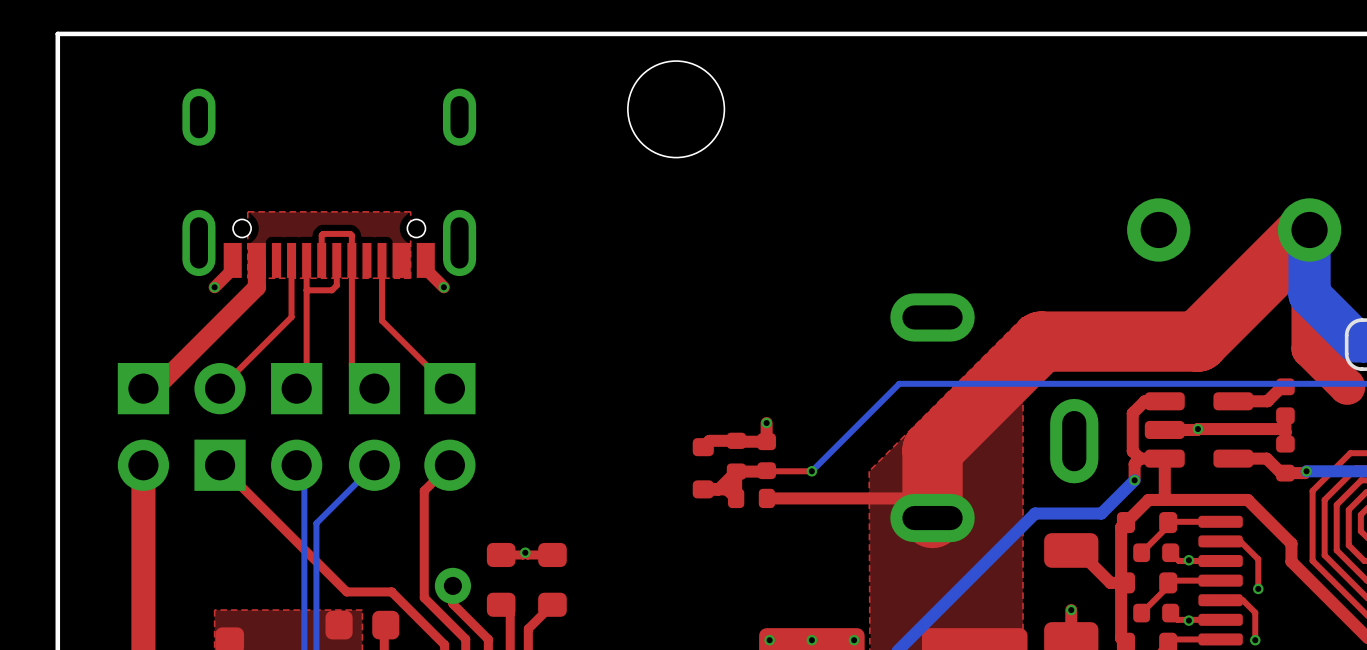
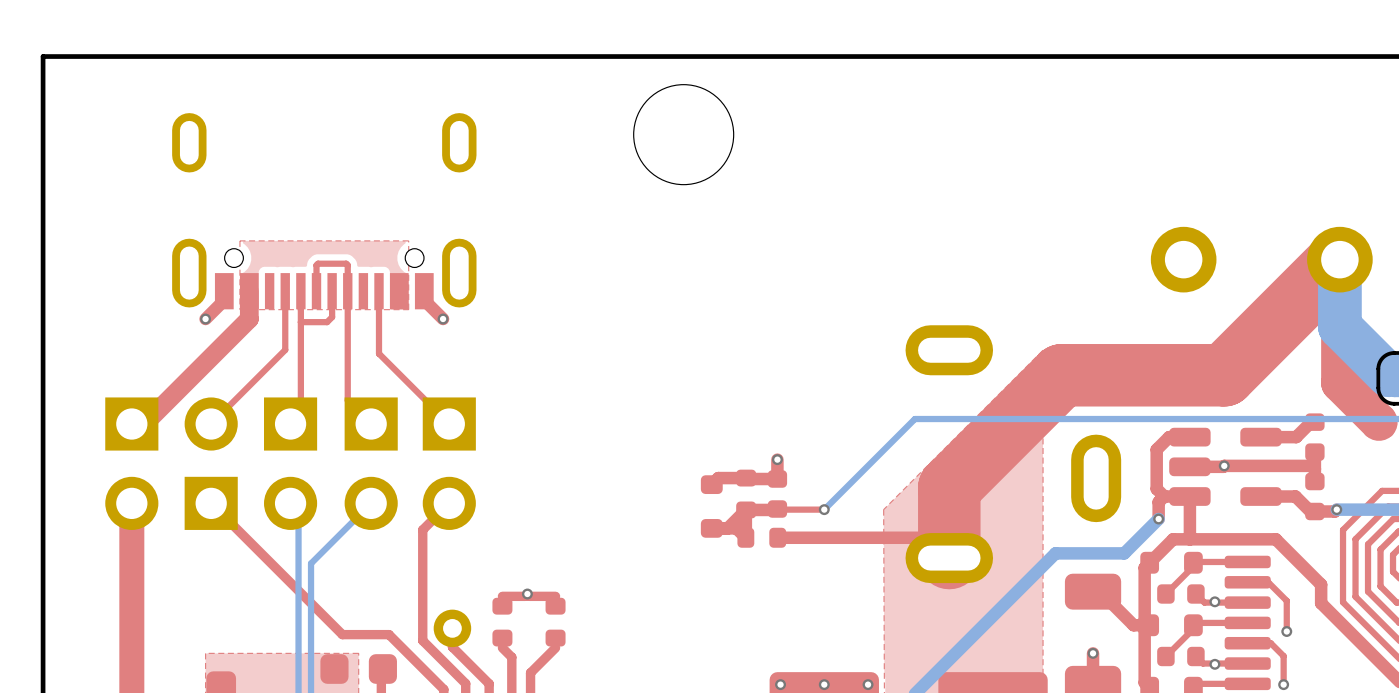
part footprint: [486, 542, 516, 617] -> [492, 597, 513, 647]
part footprint: [538, 542, 567, 617] -> [545, 597, 566, 647]

